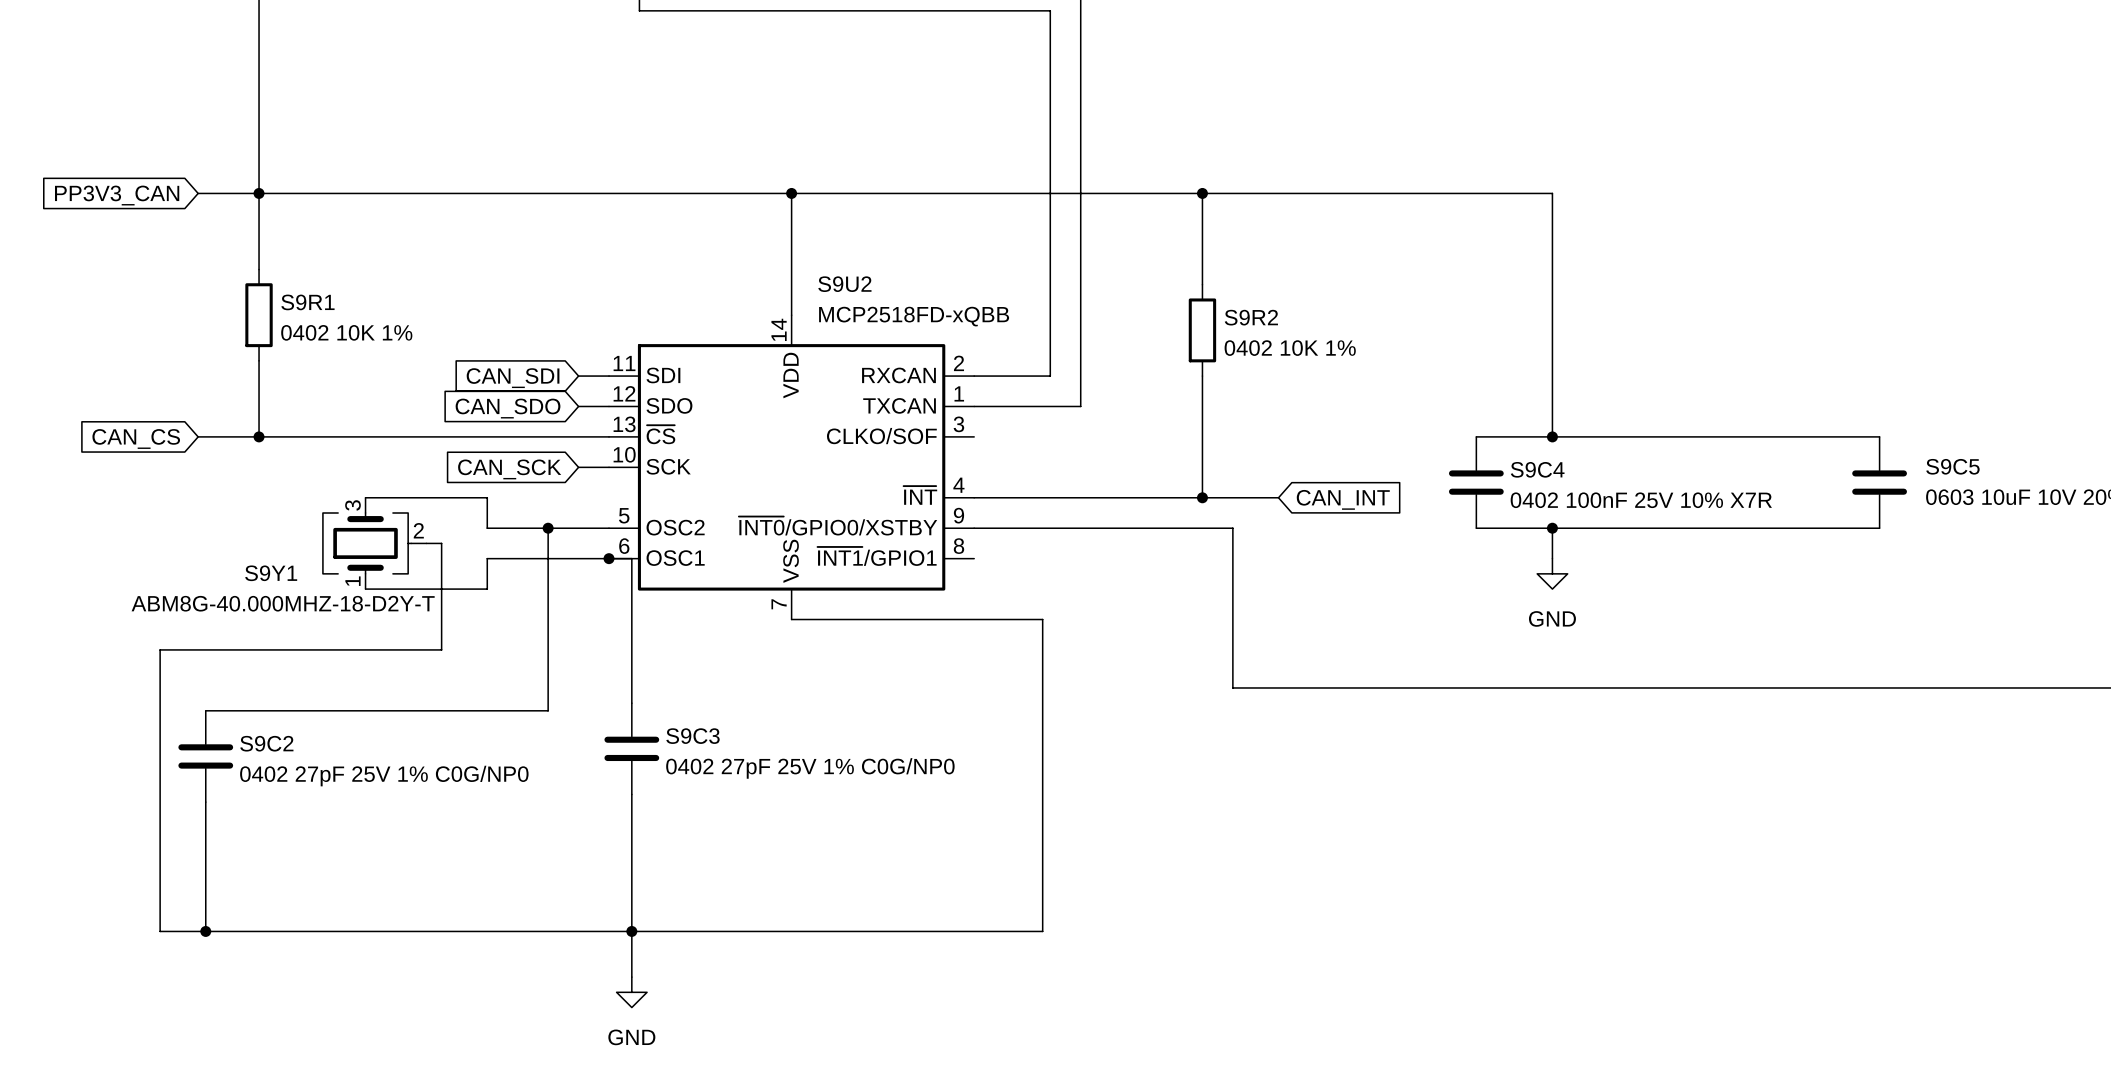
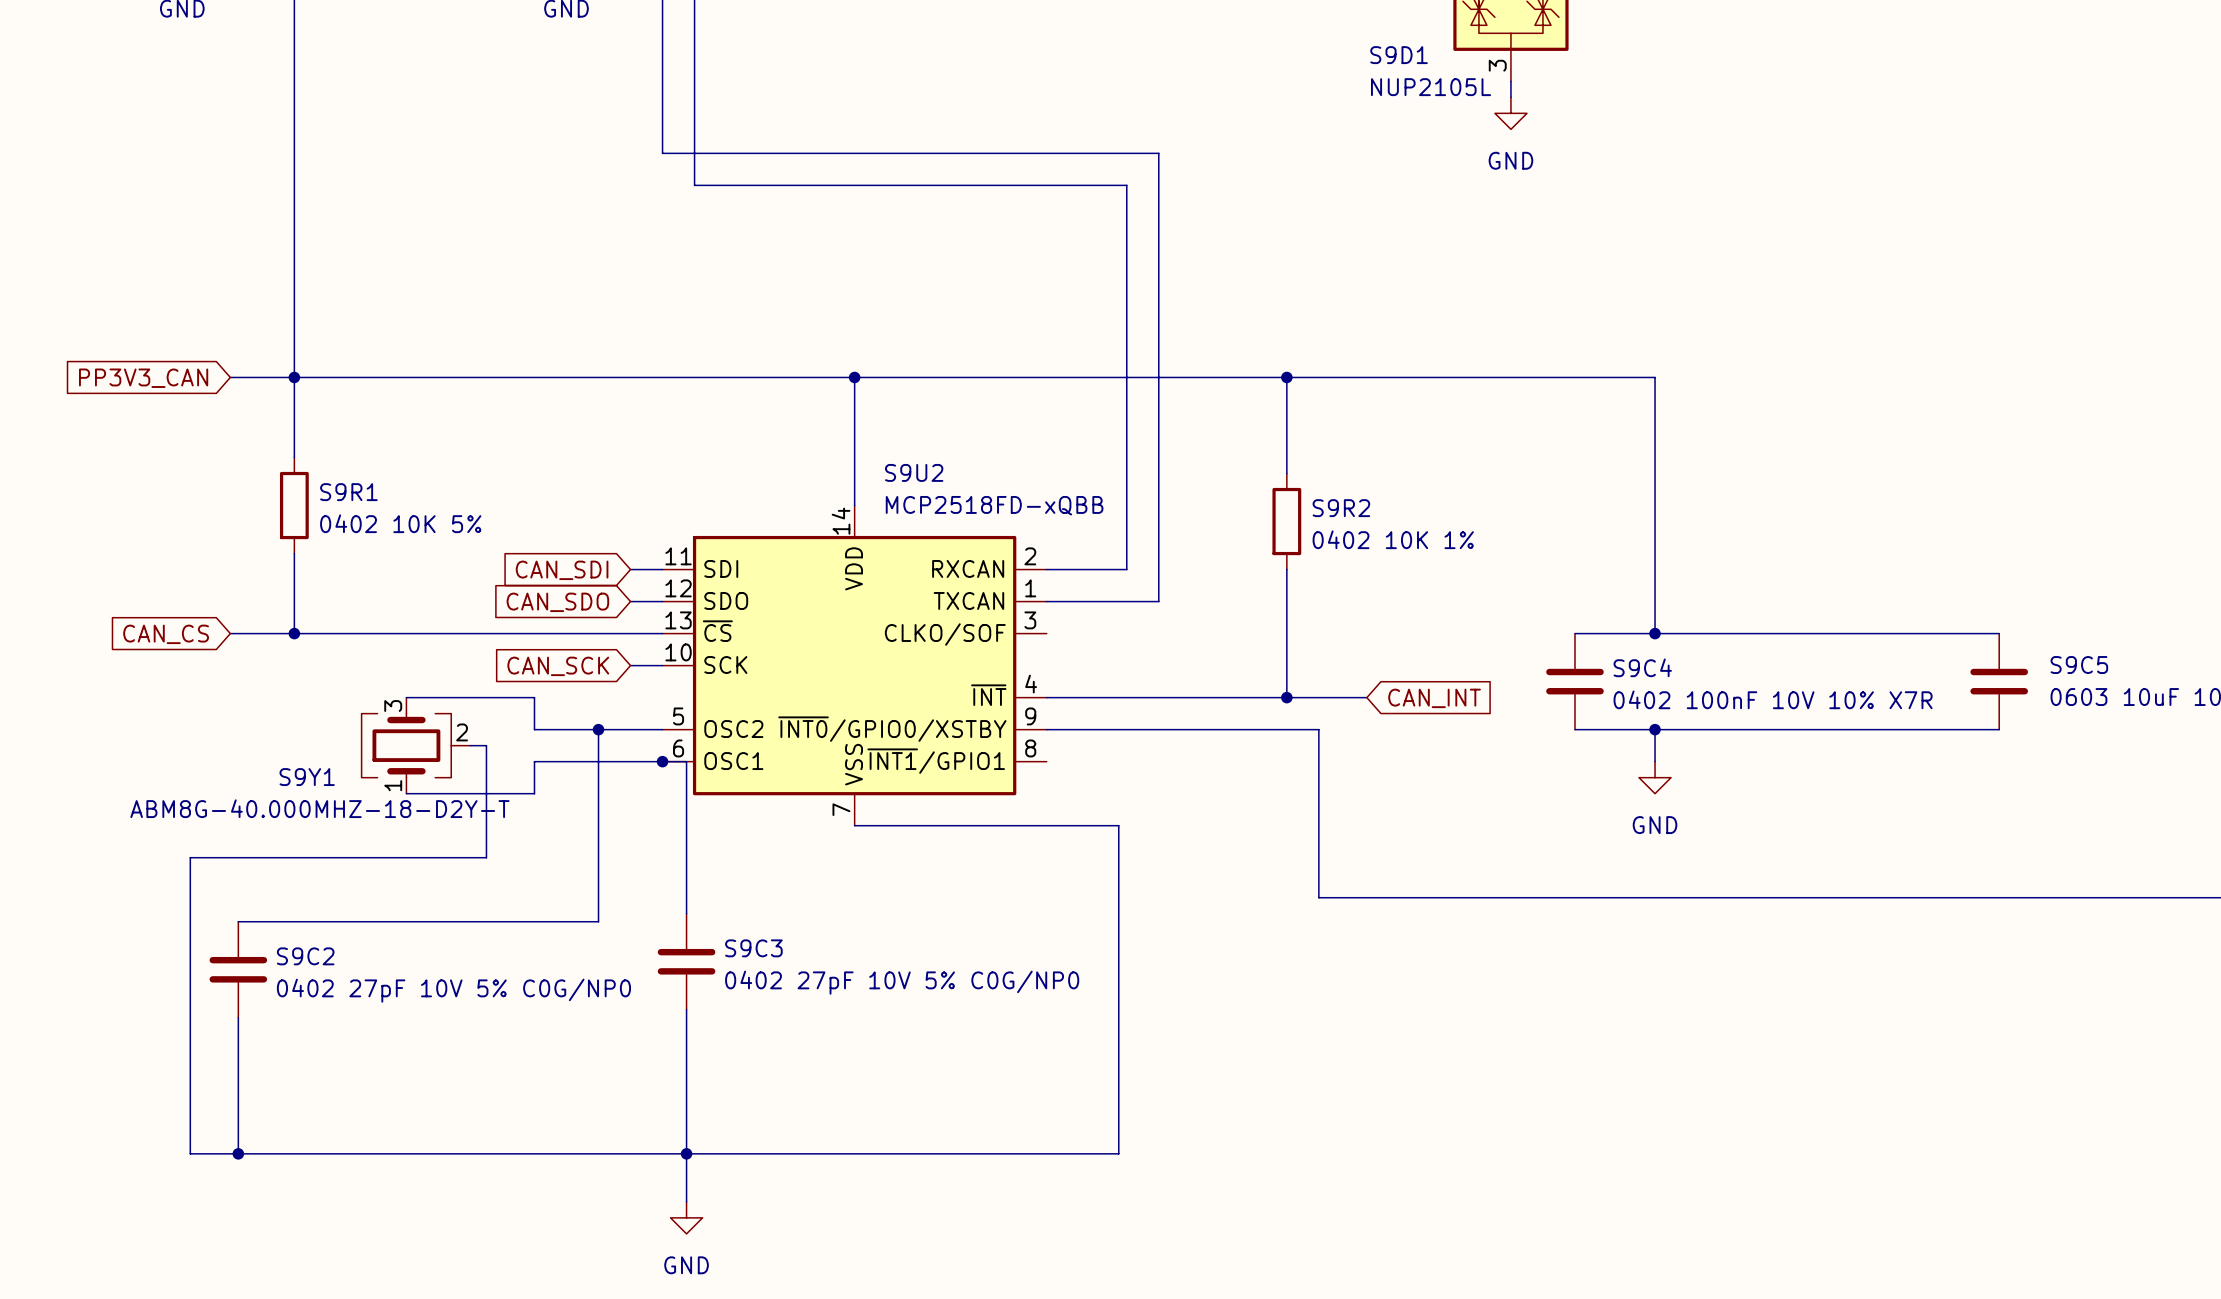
S9R1 value: 0402 10K 1% (346, 332) -> 0402 10K 5% (400, 523)
S9C4 value: 0402 100nF 25V 10% X7R (1641, 500) -> 0402 100nF 10V 10% X7R (1773, 699)
S9C3 value: 0402 27pF 25V 1% C0G/NP0 (810, 768) -> 0402 27pF 10V 5% C0G/NP0 (902, 982)
S9C2 value: 0402 27pF 25V 1% C0G/NP0 (384, 776) -> 0402 27pF 10V 5% C0G/NP0 (453, 990)

